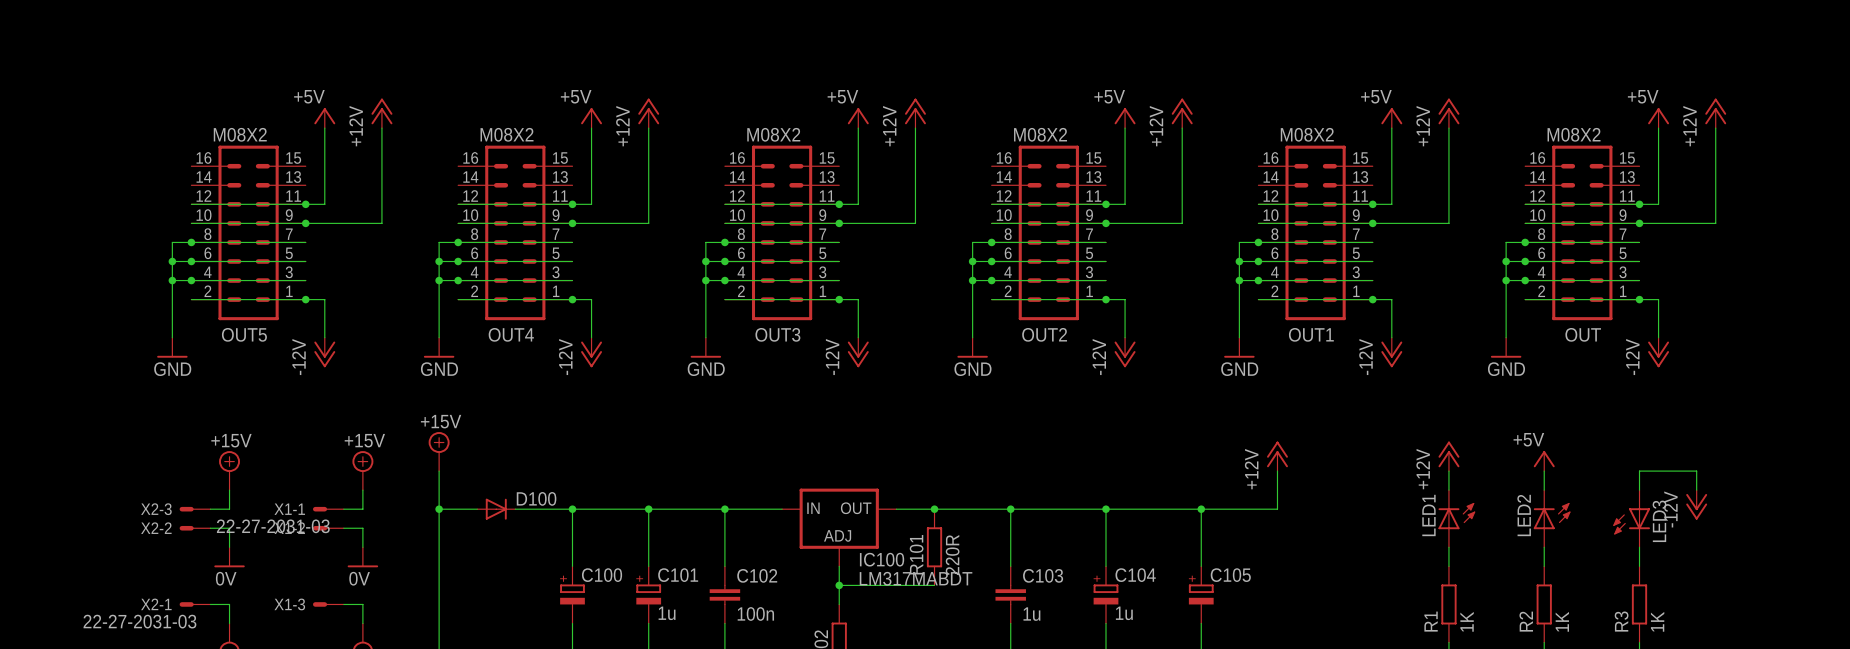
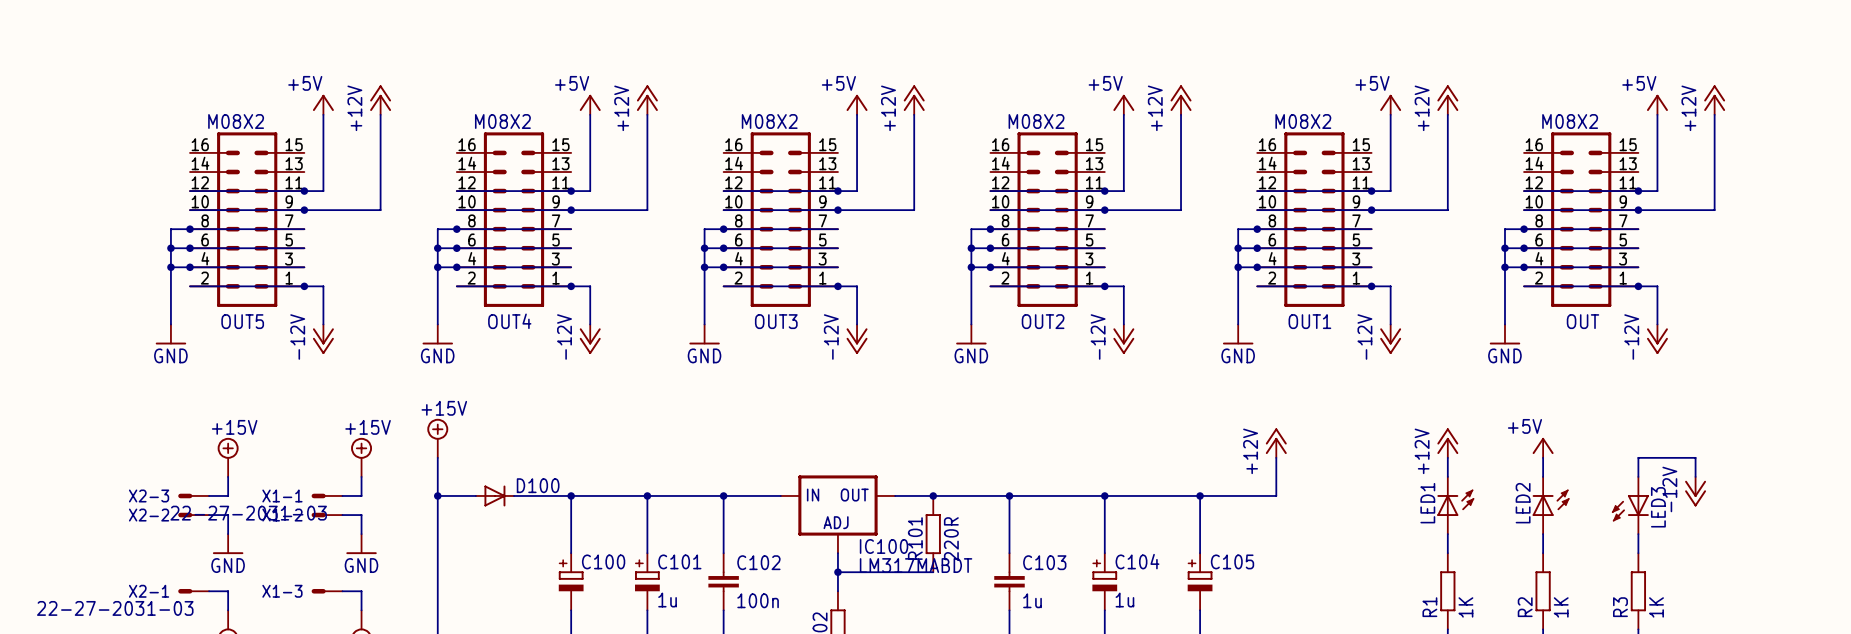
power symbol: 0V (229, 557) -> GND (228, 544)
power symbol: 0V (362, 557) -> GND (361, 544)

